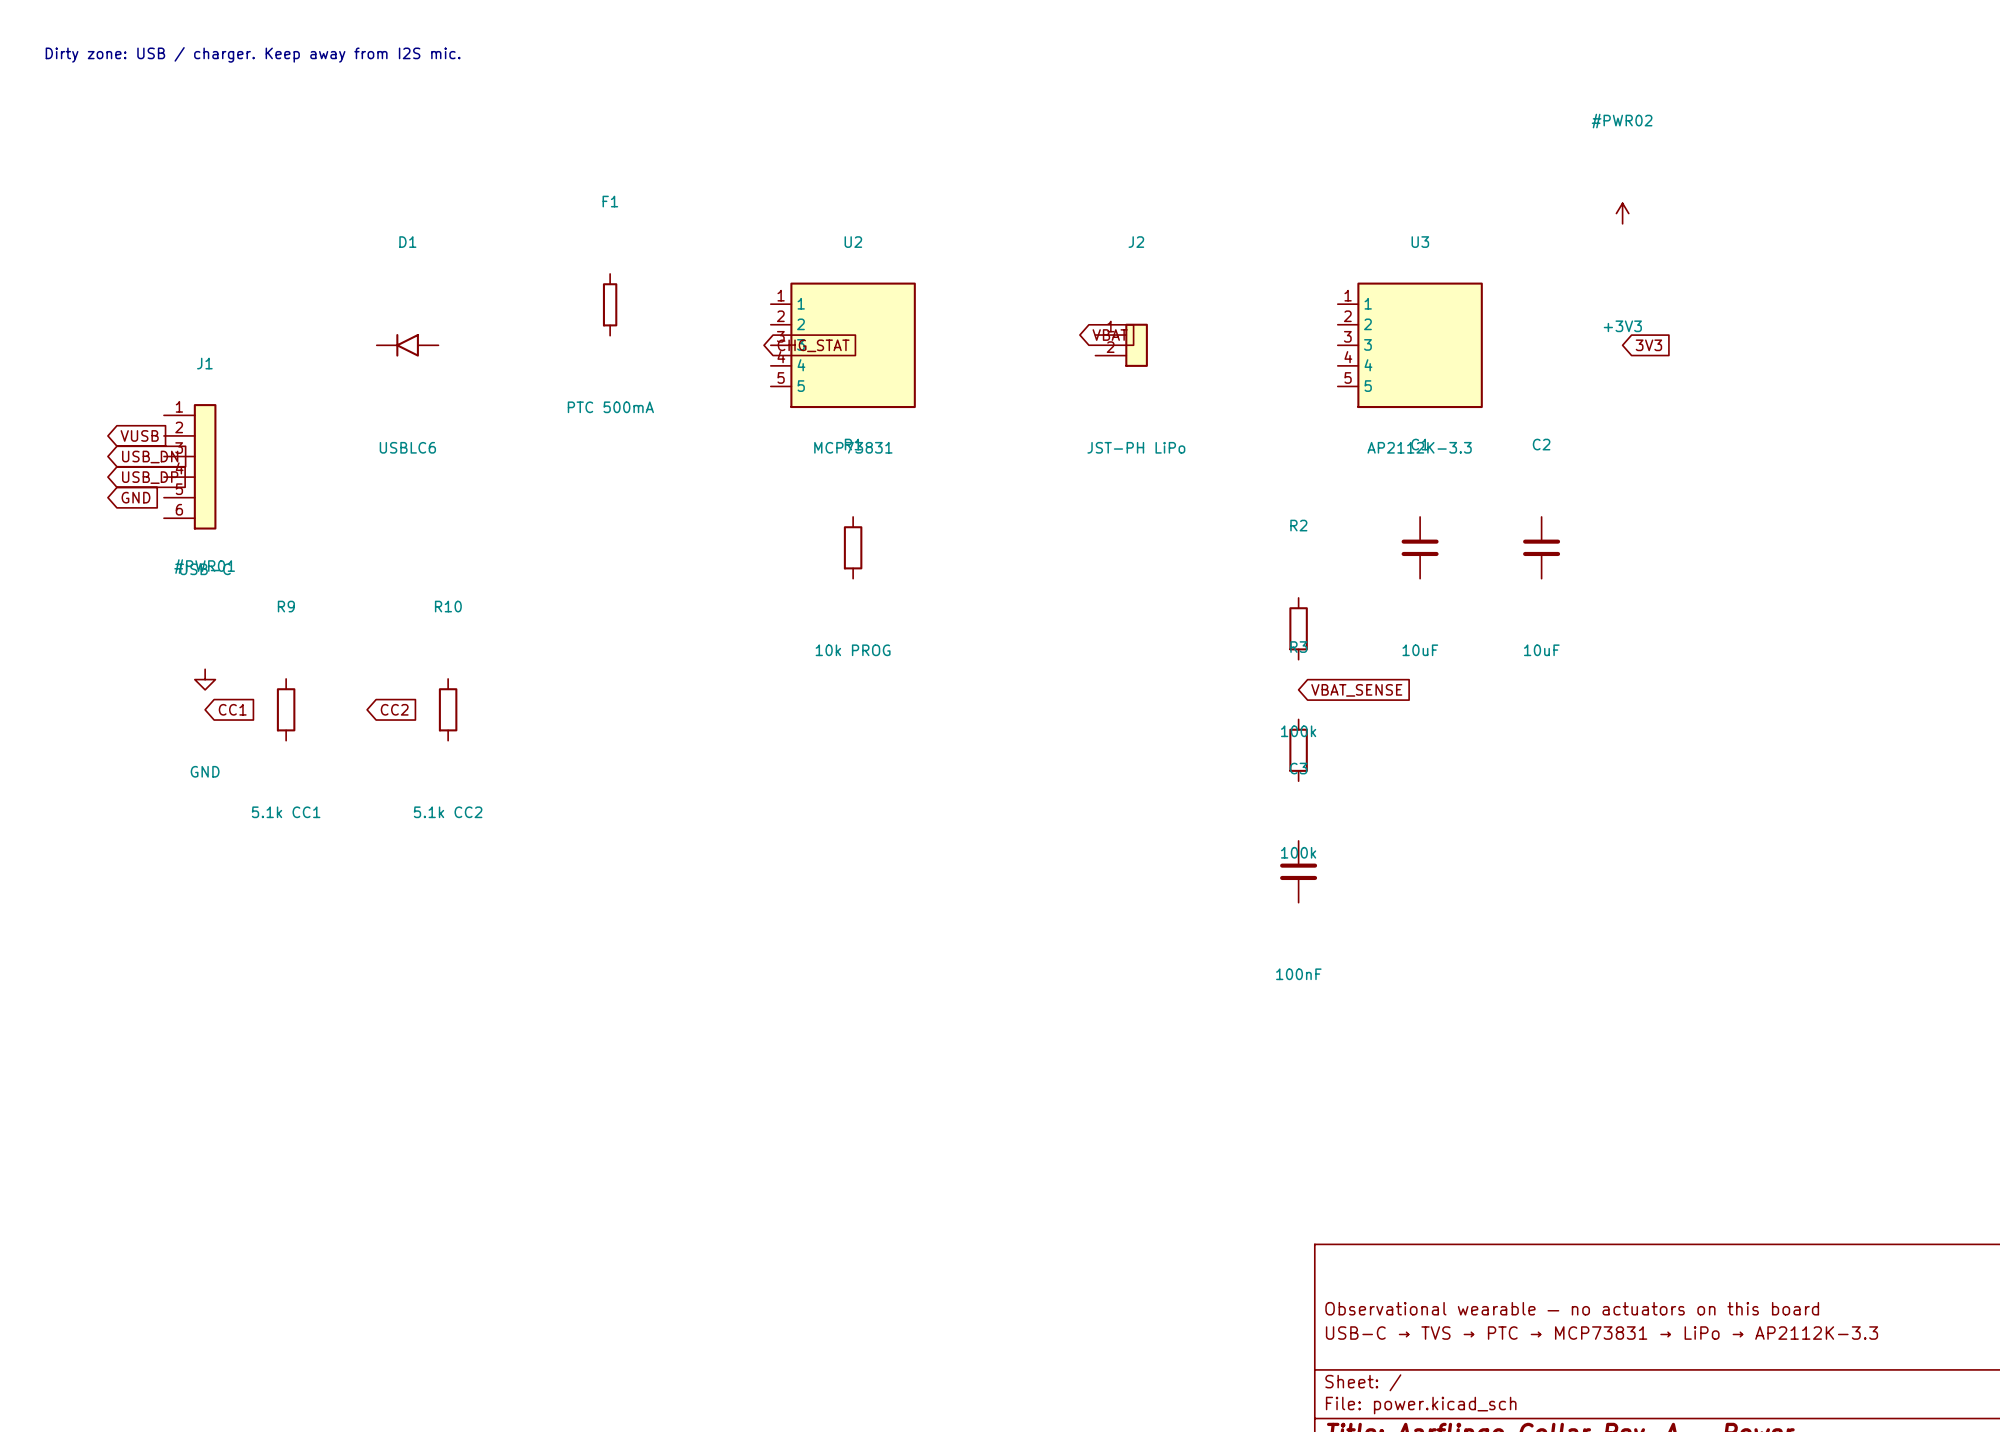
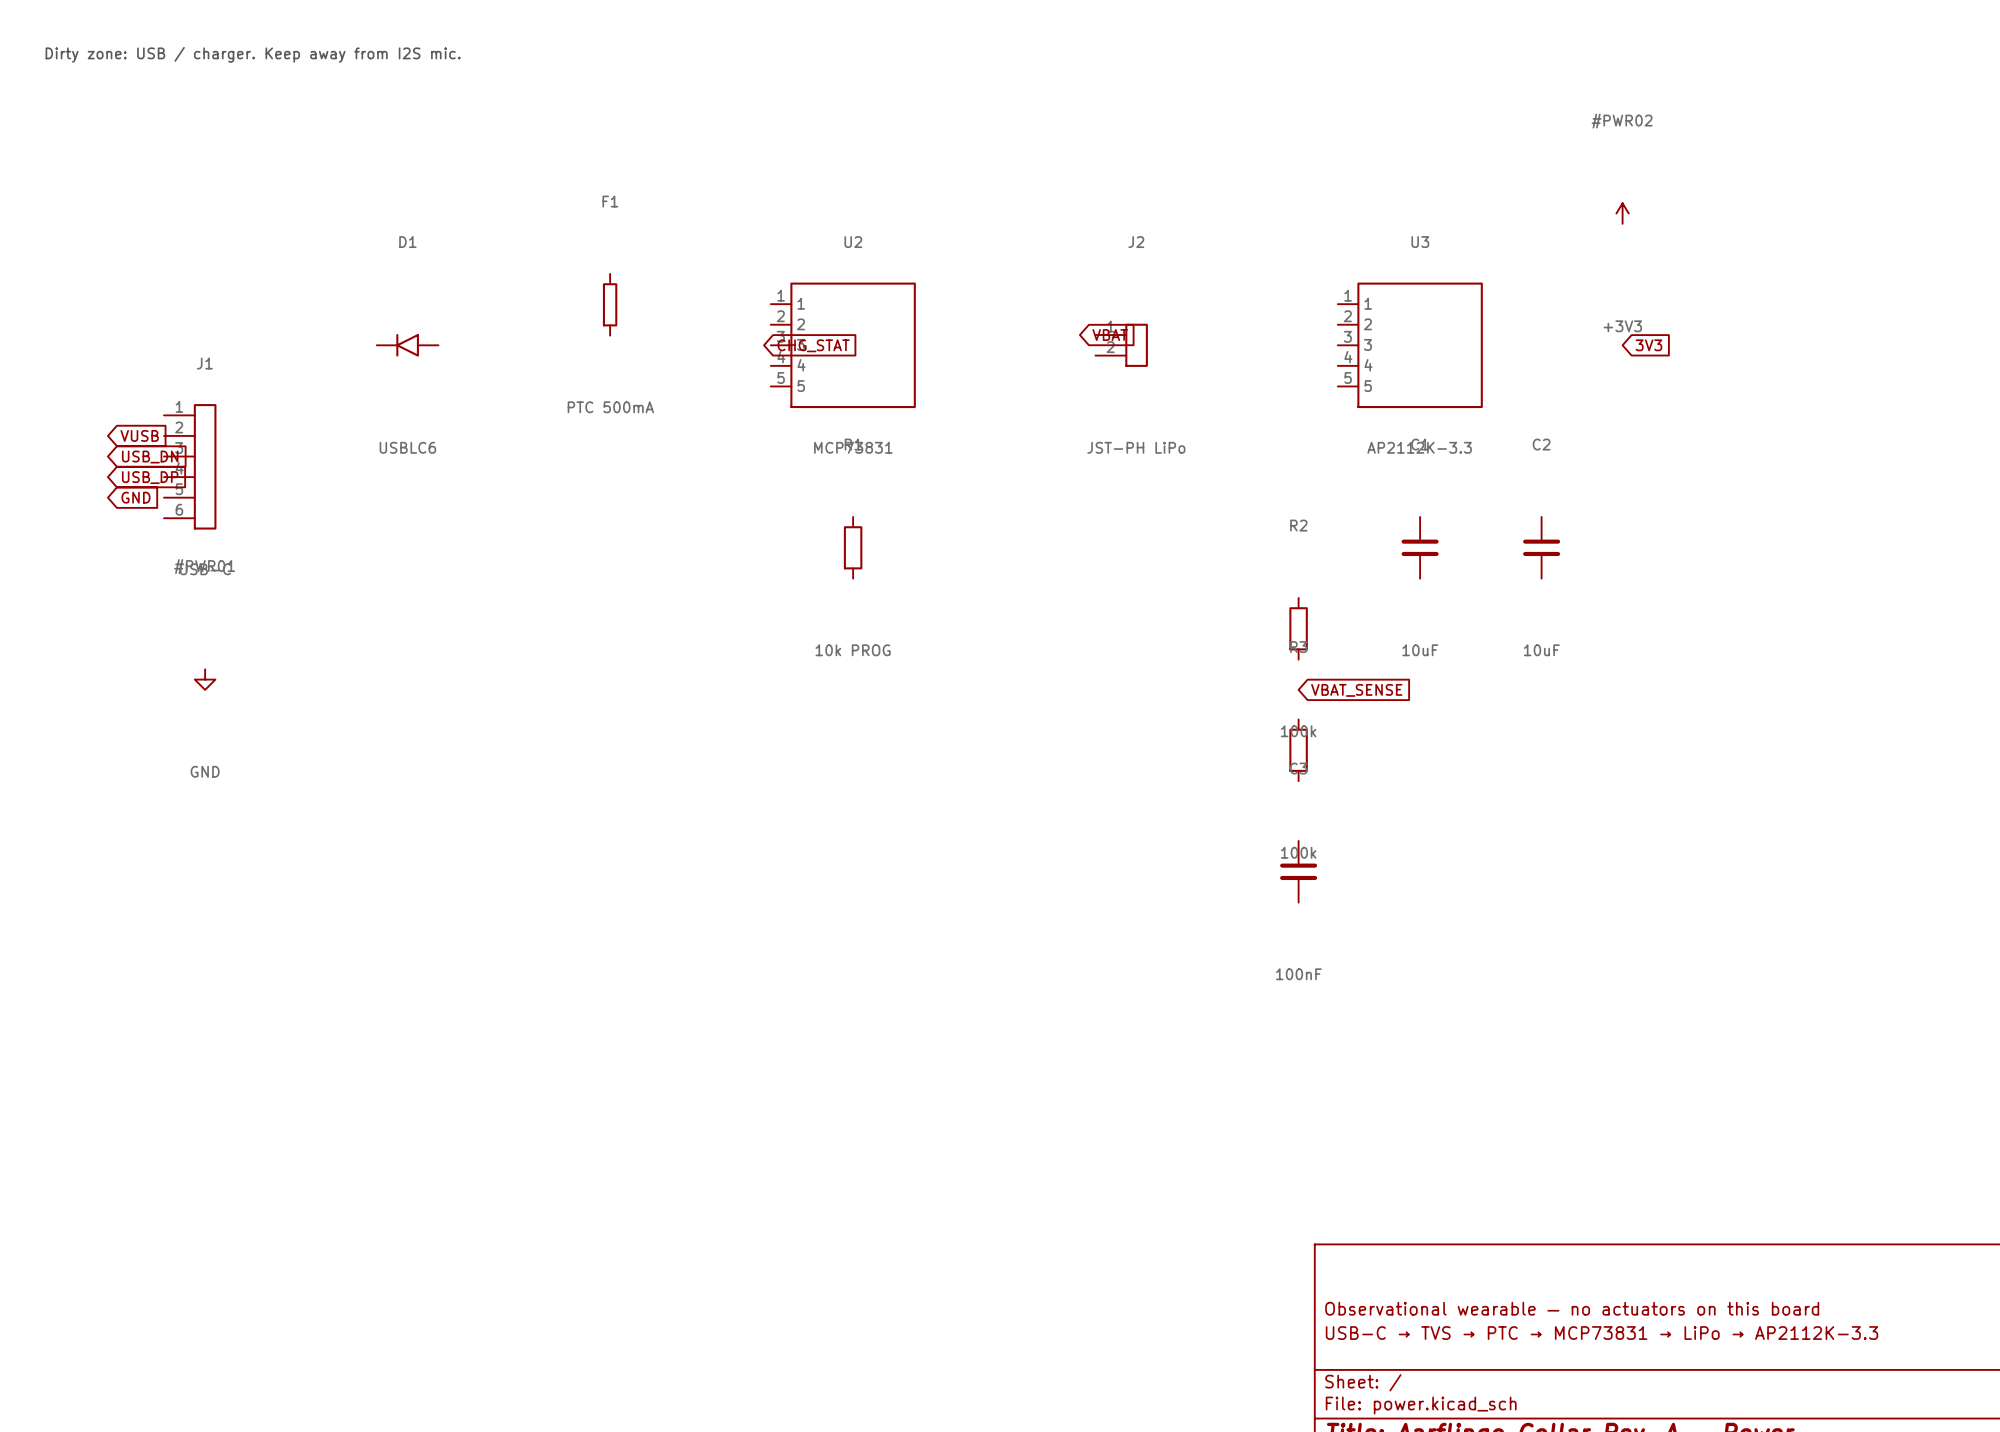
global label: CC1 (232, 709) -> none
R9: 5.1k CC1 (286, 709) -> none
global label: CC2 (394, 709) -> none
R10: 5.1k CC2 (448, 709) -> none

